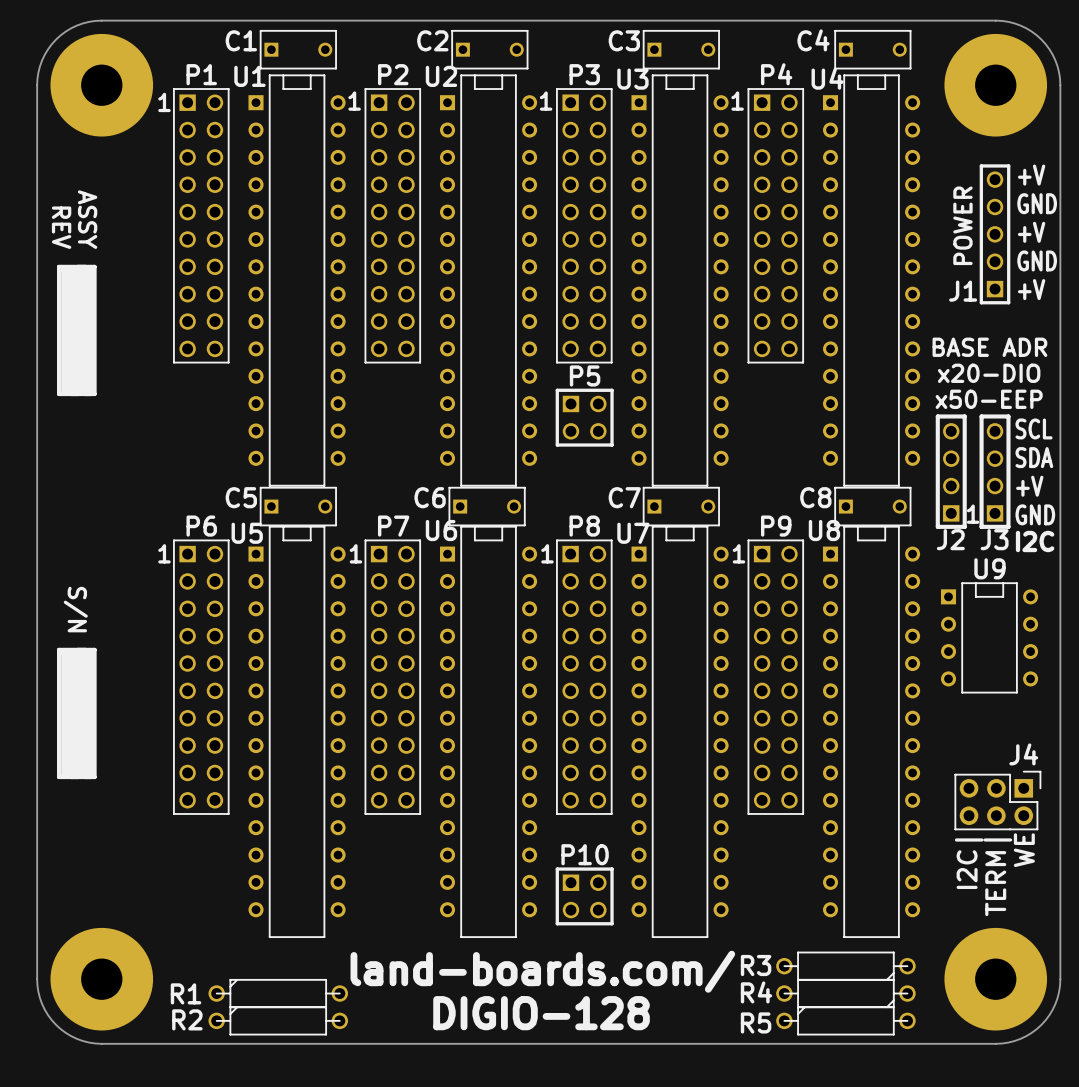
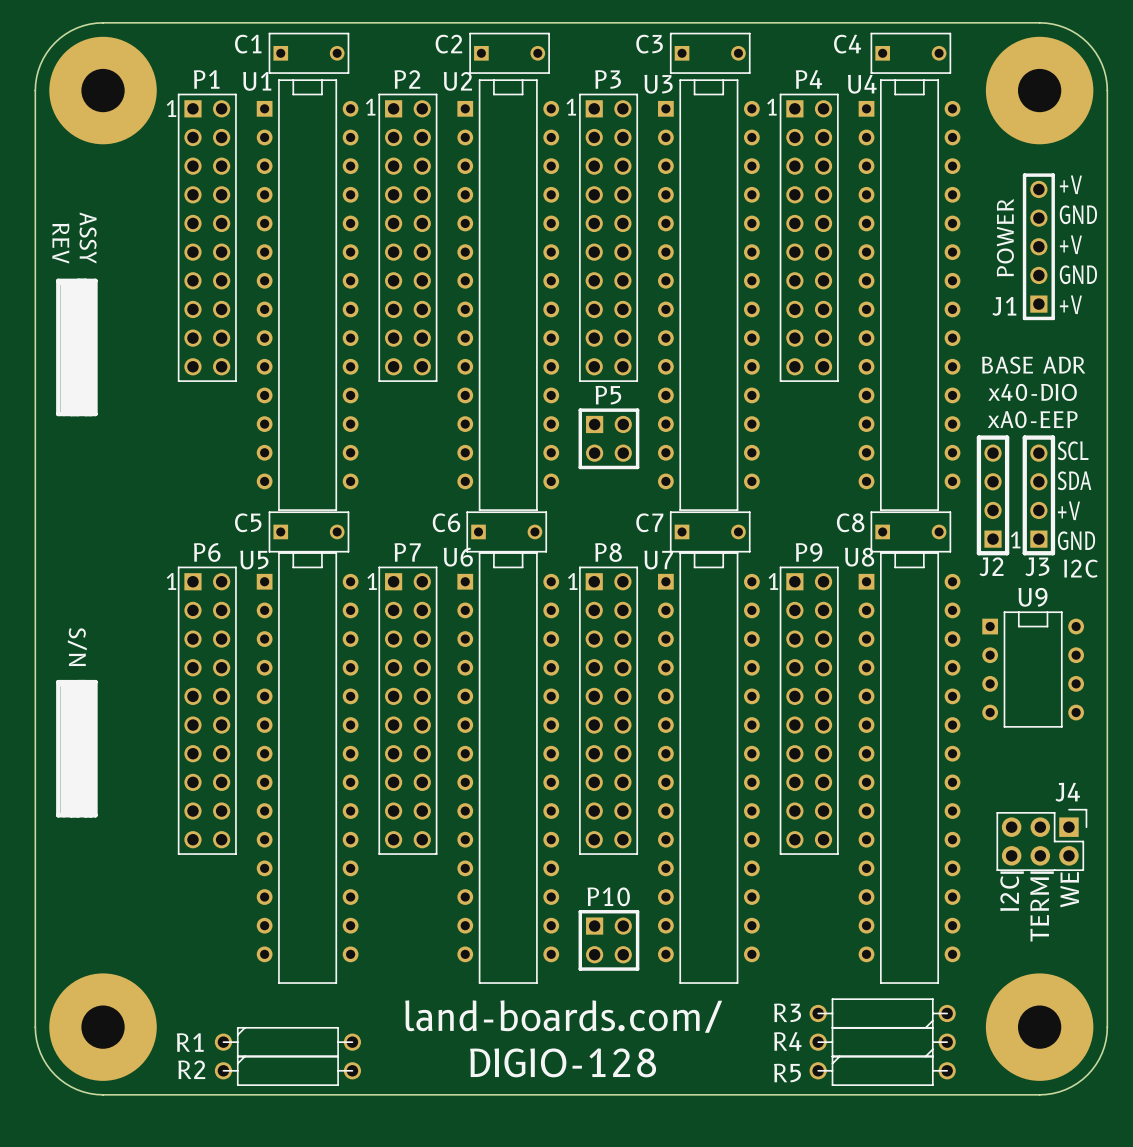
text: x20-DIO (989, 373) -> x40-DIO (1032, 392)
text: x50-EEP (989, 399) -> xA0-EEP (1032, 419)

